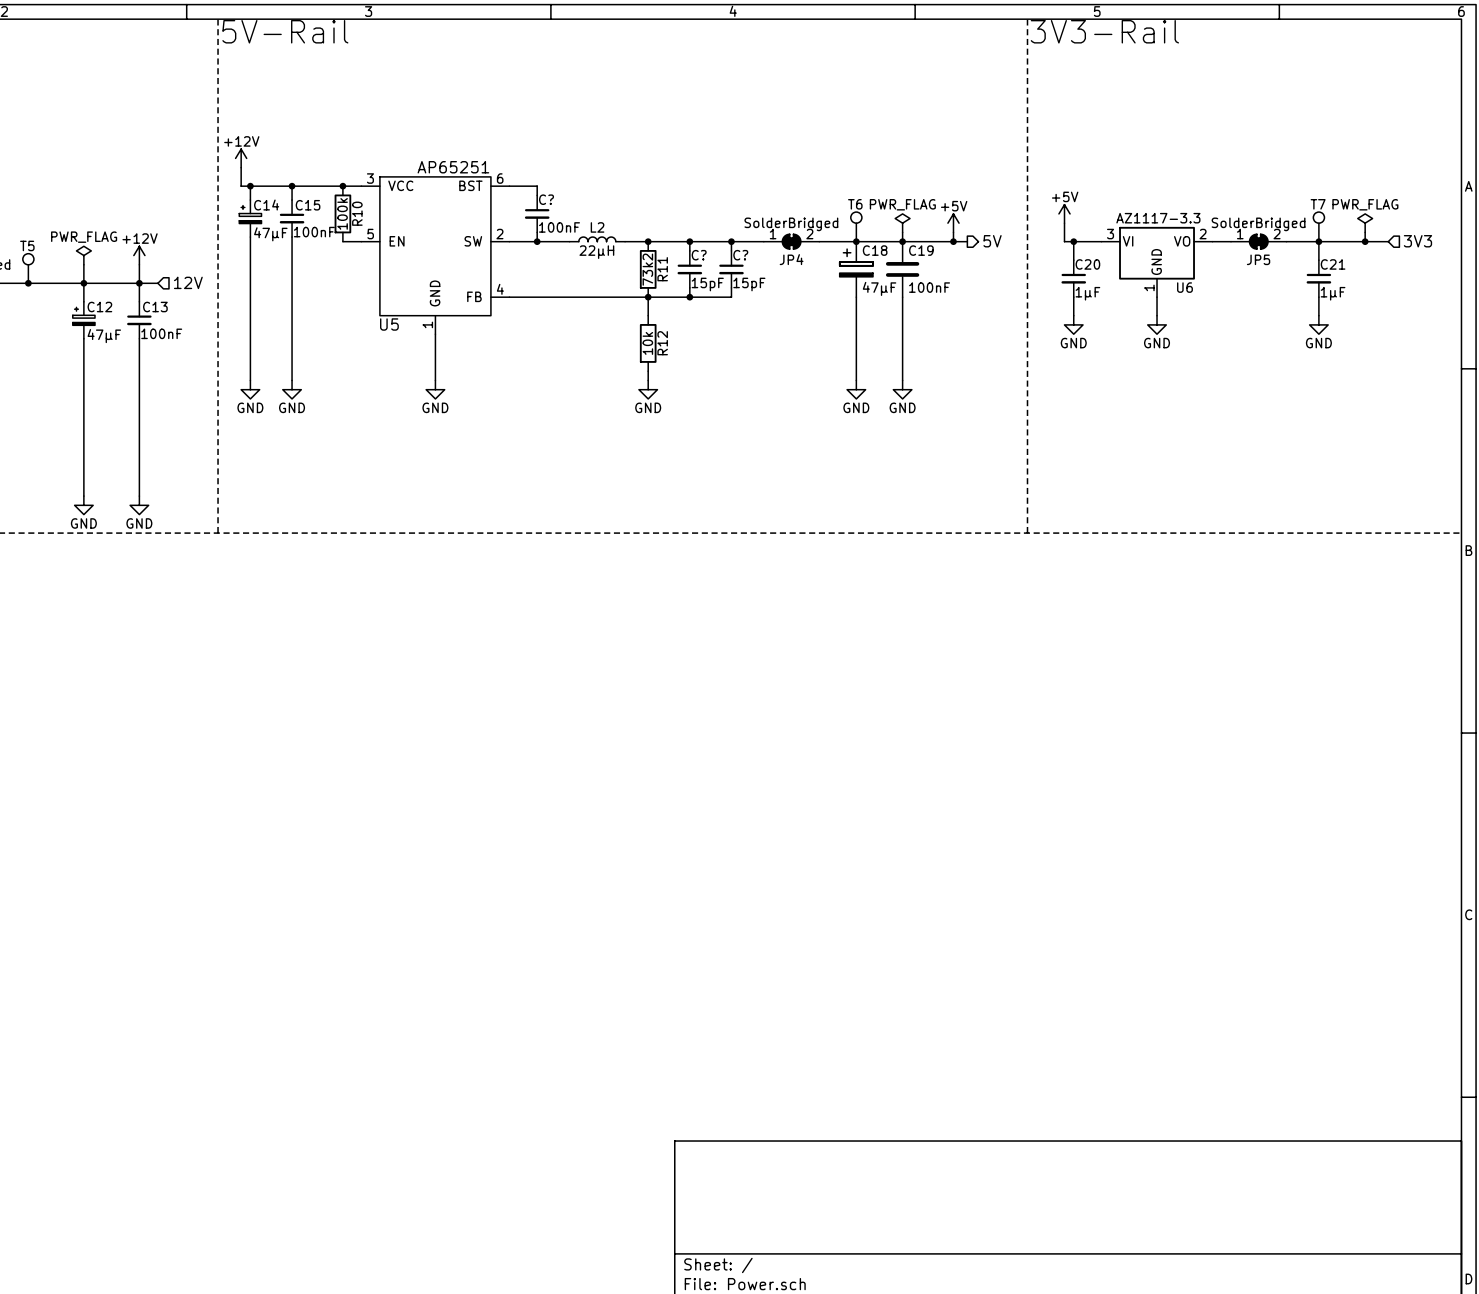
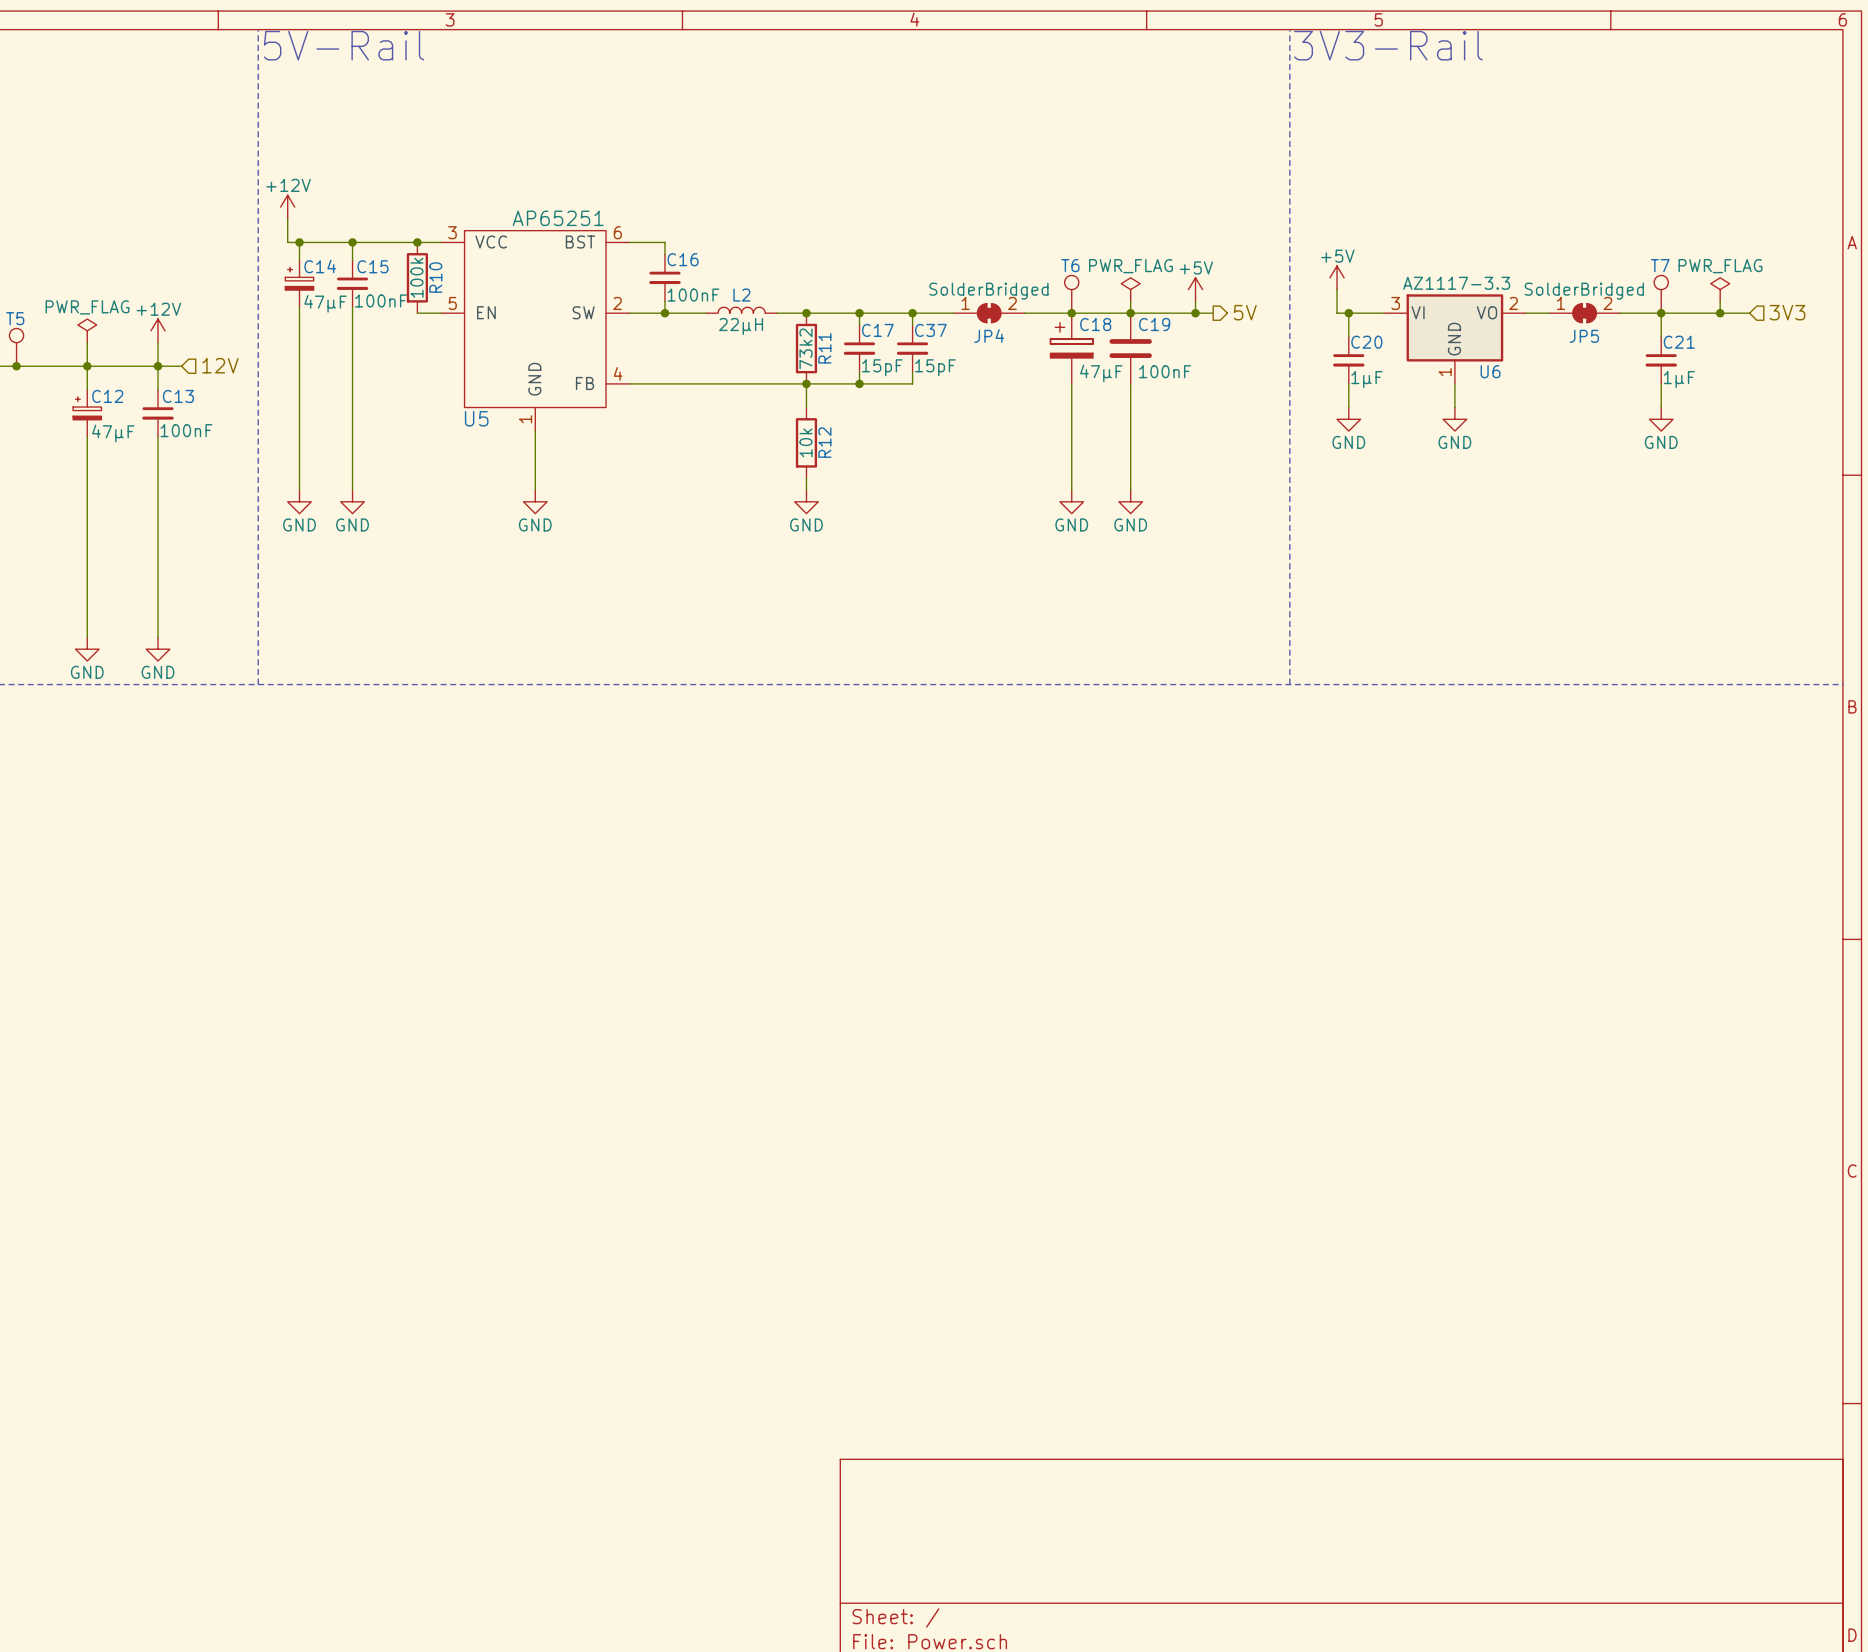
C? name: C? (546, 199) -> C16 (683, 259)
C? name: C? (699, 255) -> C17 (877, 330)
C? name: C? (740, 255) -> C37 (930, 330)

